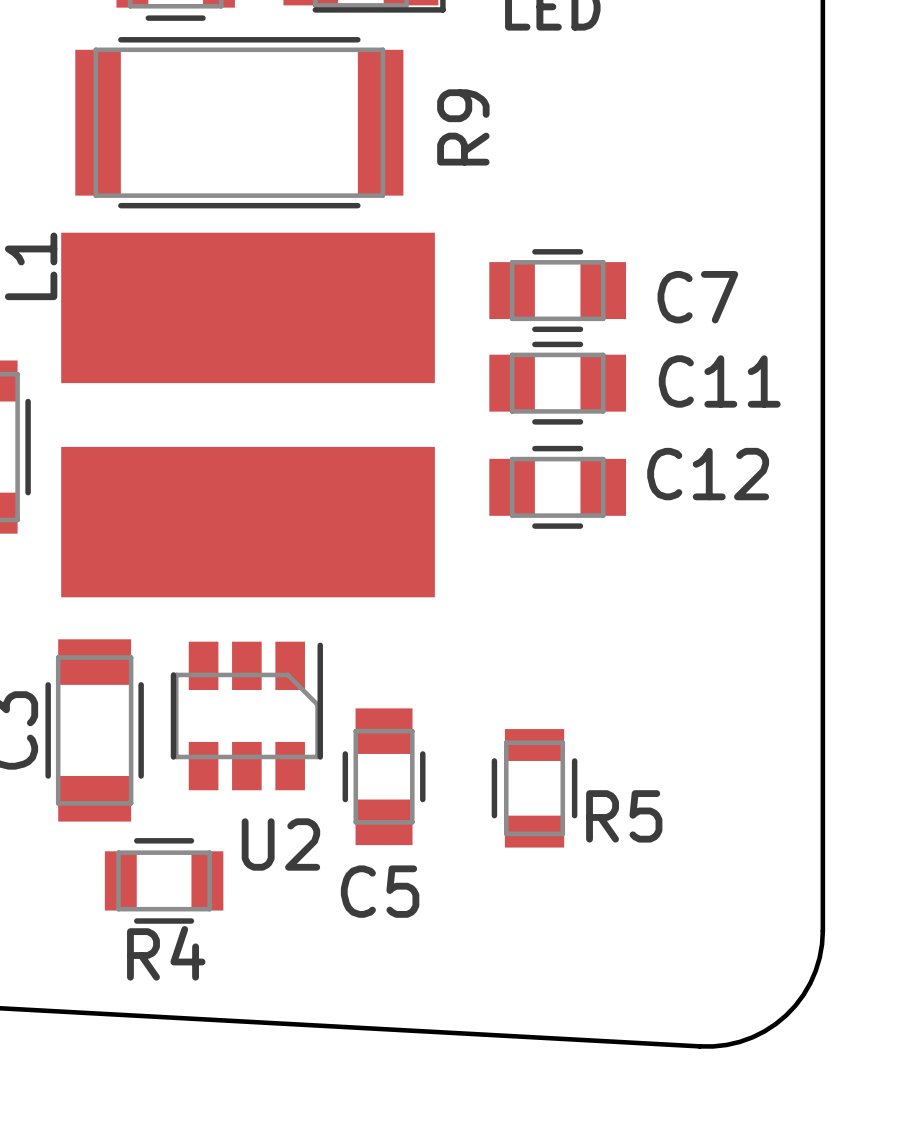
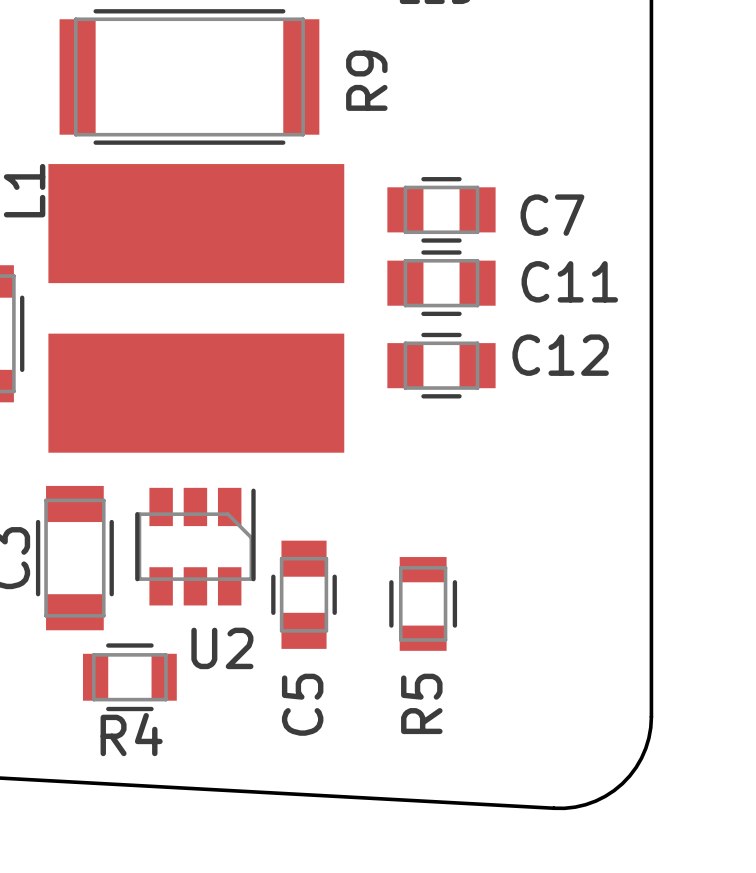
R5 name rotation: 0° (624, 816) -> 90° counterclockwise (421, 703)
R5 name position: R5 (624, 816) -> R5 (421, 703)
C5 name rotation: 0° (380, 891) -> 90° counterclockwise (302, 704)

